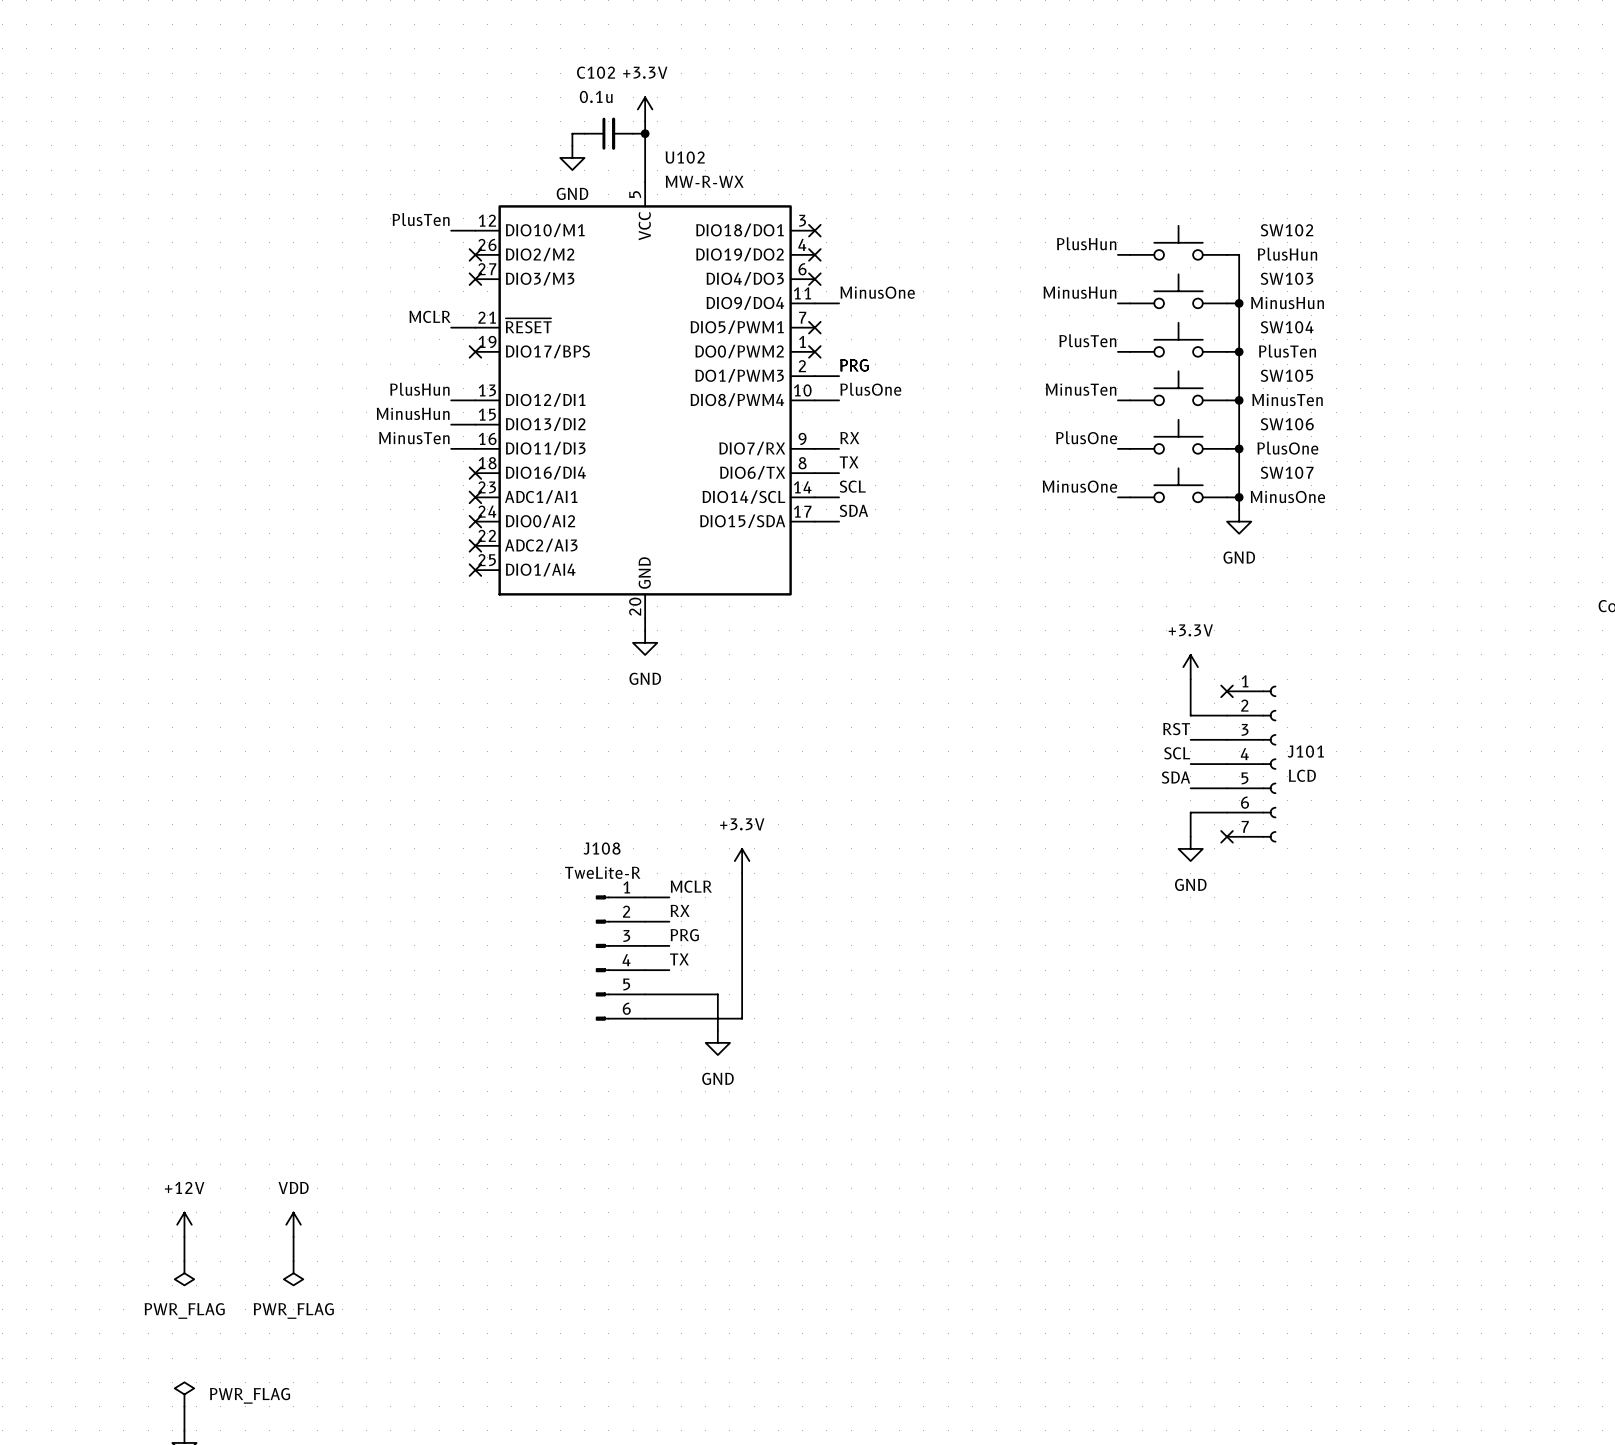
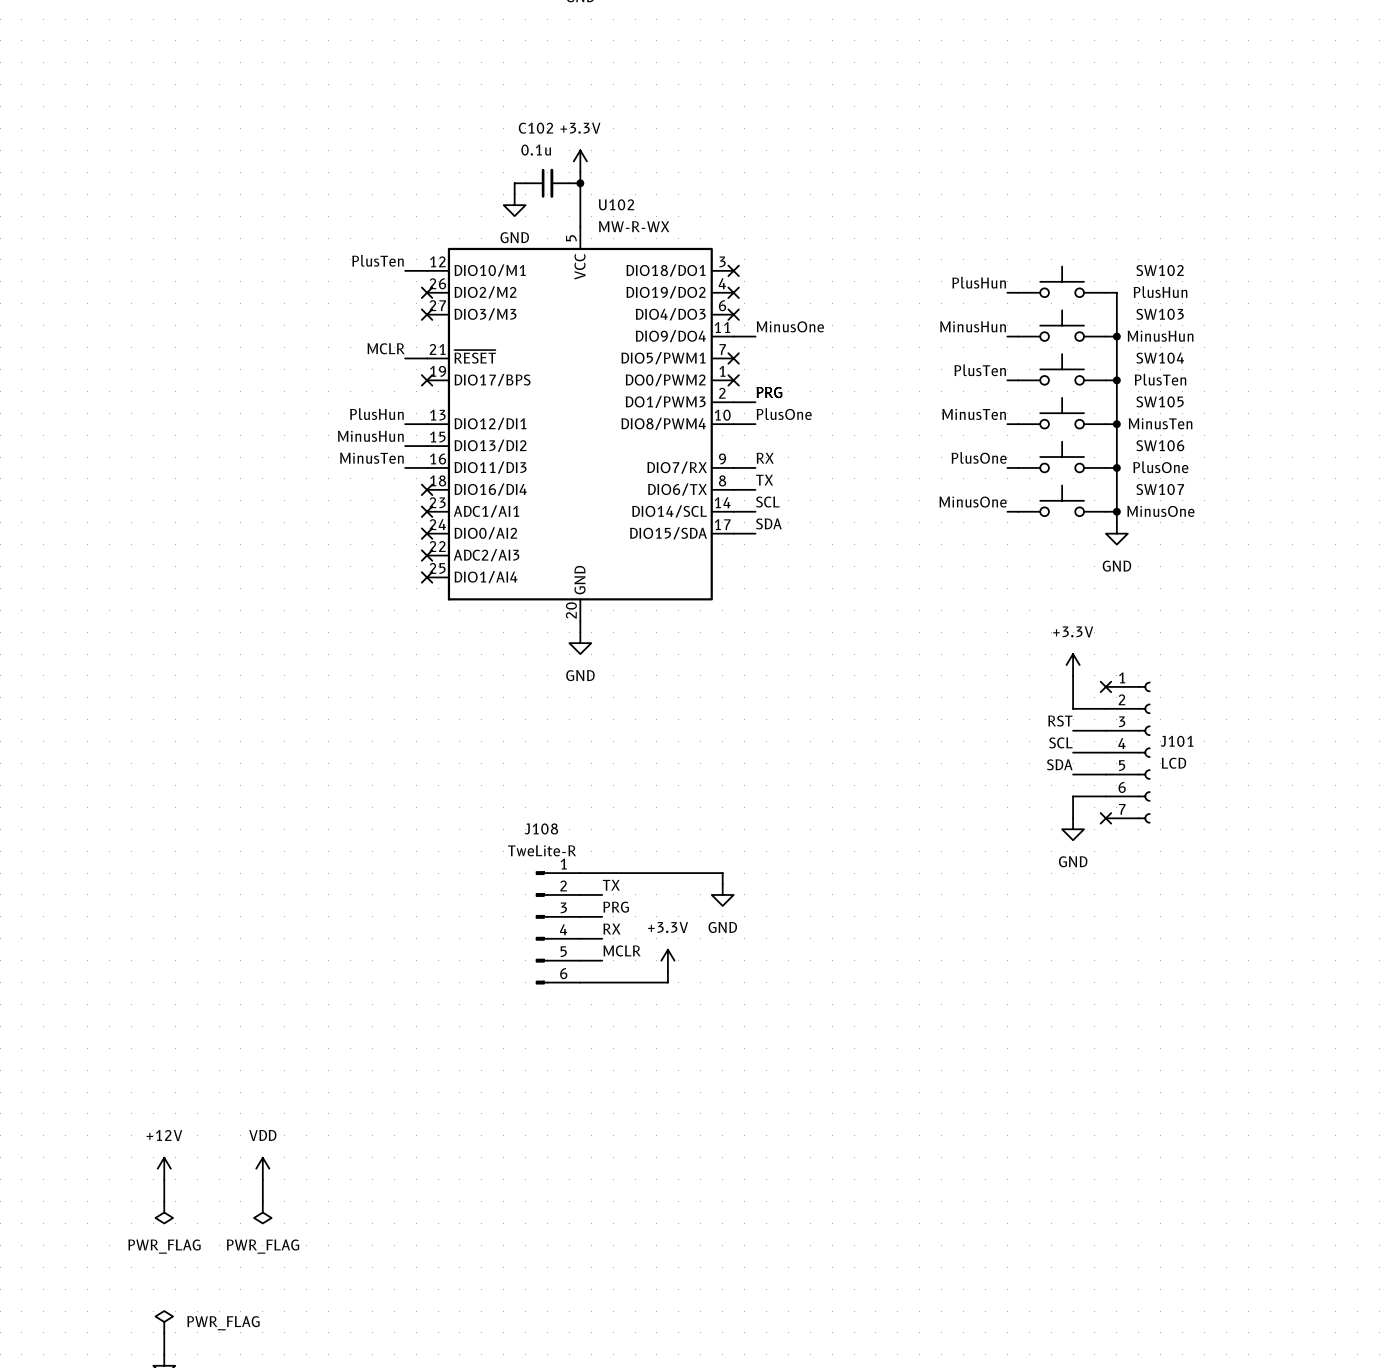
power symbol position: +3.3V (742, 861) -> +3.3V (667, 960)
wire: (742, 873) (742, 1006) -> none
label position: MCLR (691, 886) -> MCLR (622, 950)
wire: none -> (602, 873) (722, 873) (722, 884)
label: RX (680, 910) -> TX (611, 885)
label: TX (679, 959) -> RX (611, 929)
wire: (669, 994) (717, 994) (717, 1030) -> none
power symbol position: GND (717, 1042) -> GND (722, 894)

